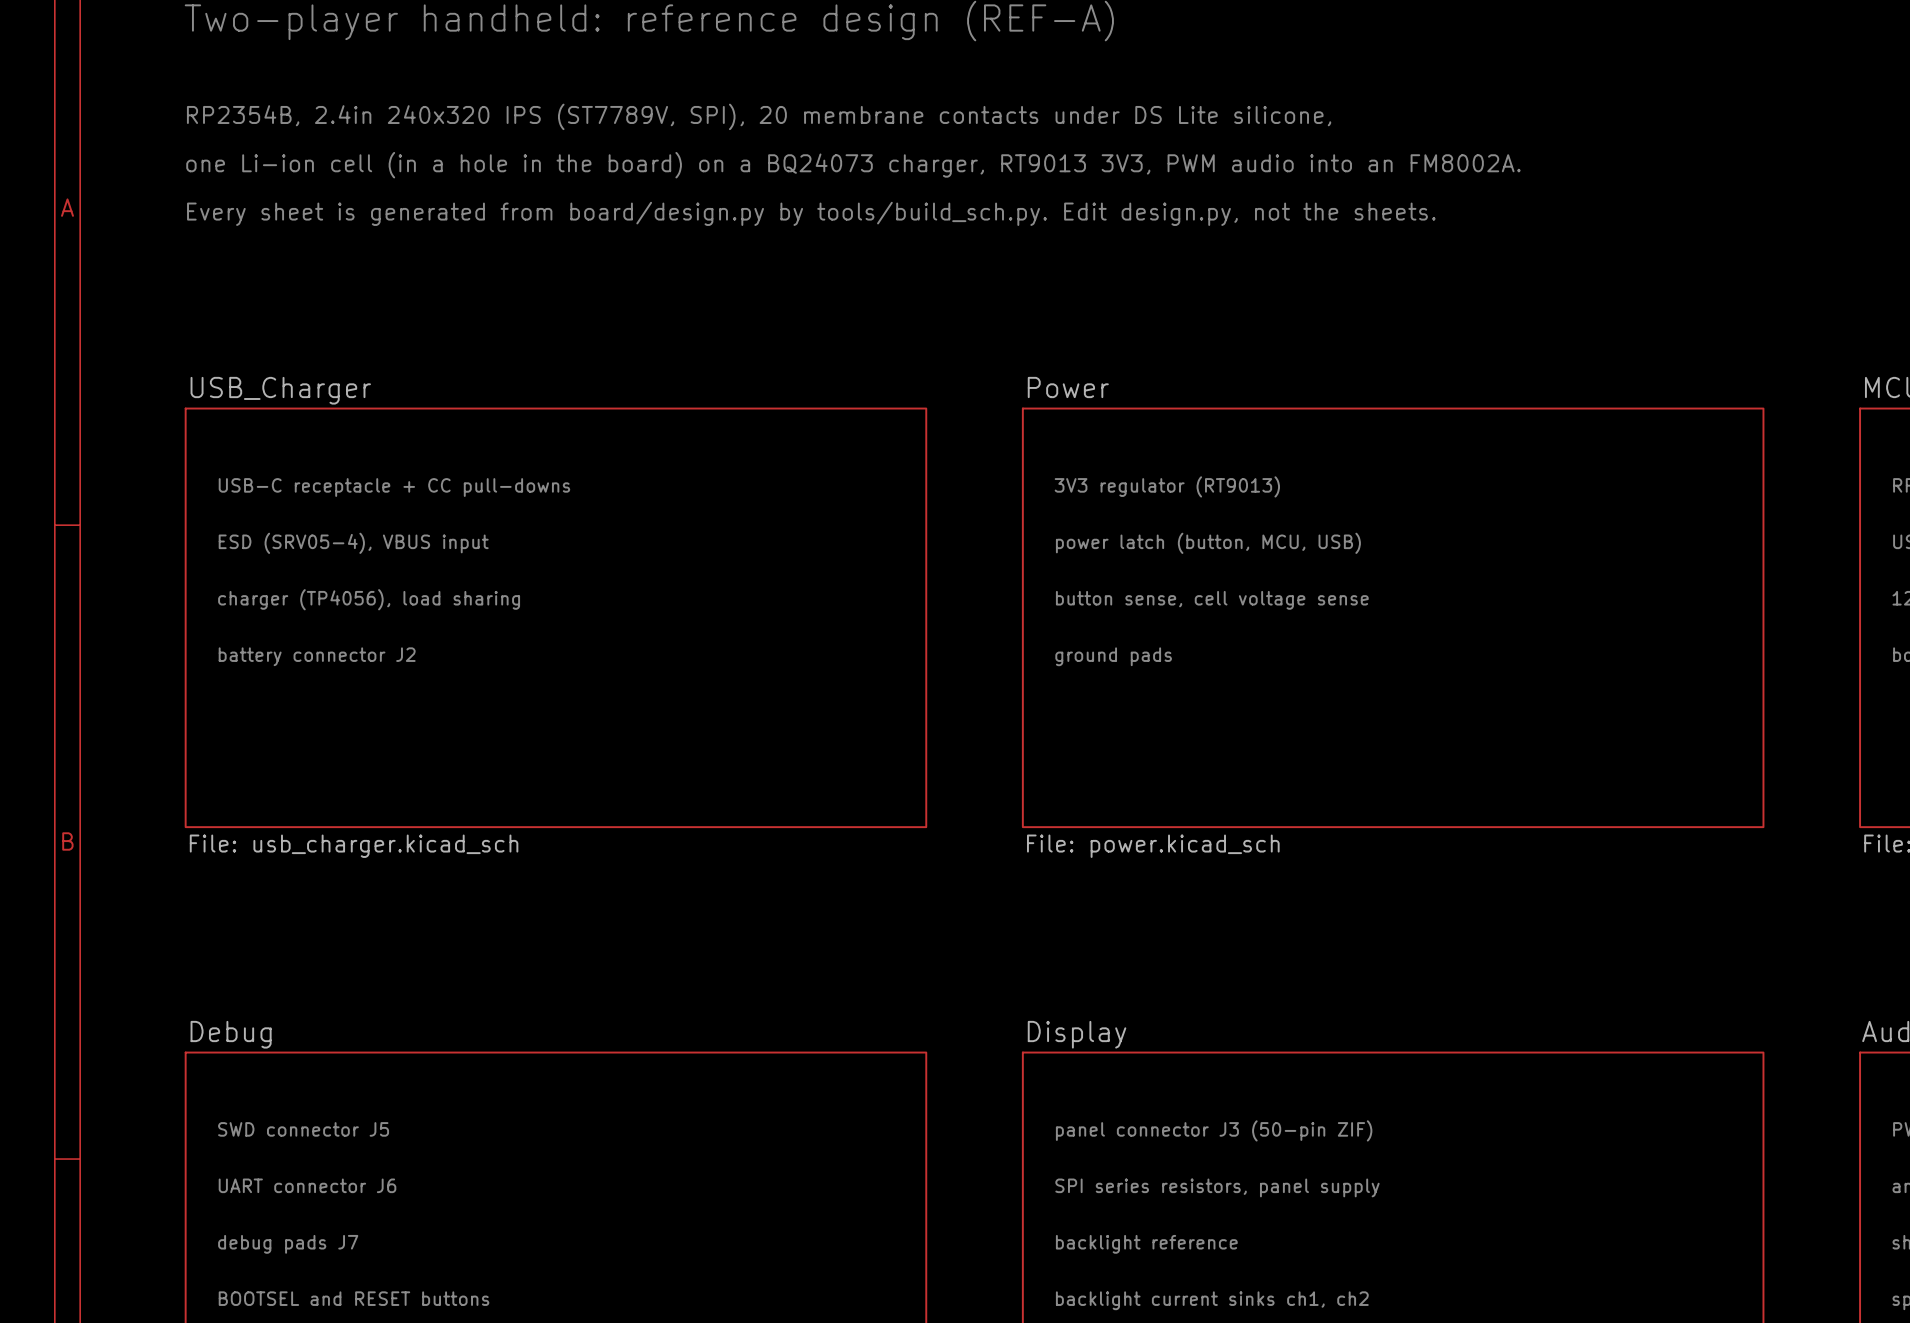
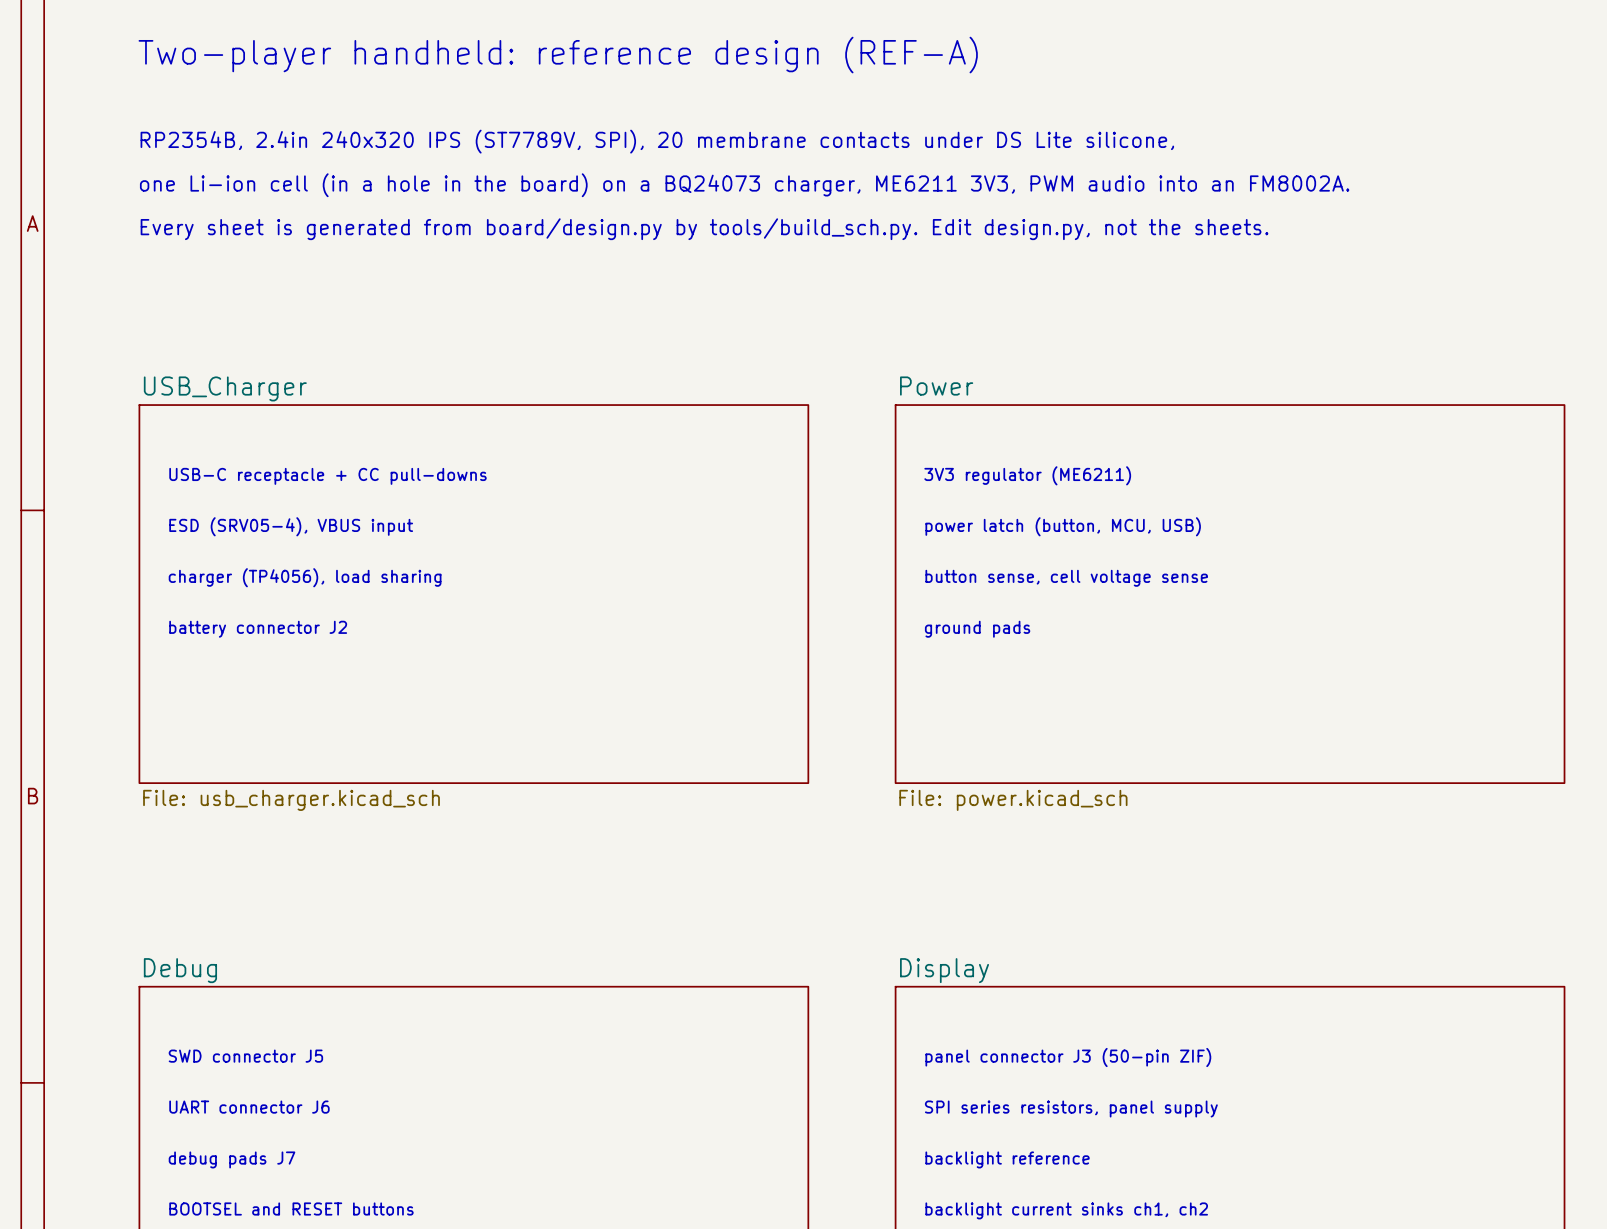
text: one Li-ion cell (in a hole in the board) on a BQ24073 charger, RT9013 3V3, PWM audio into an FM8002A. (853, 165) -> one Li-ion cell (in a hole in the board) on a BQ24073 charger, ME6211 3V3, PWM audio into an FM8002A. (744, 185)
text: 3V3 regulator (RT9013) (1167, 486) -> 3V3 regulator (ME6211) (1027, 475)

